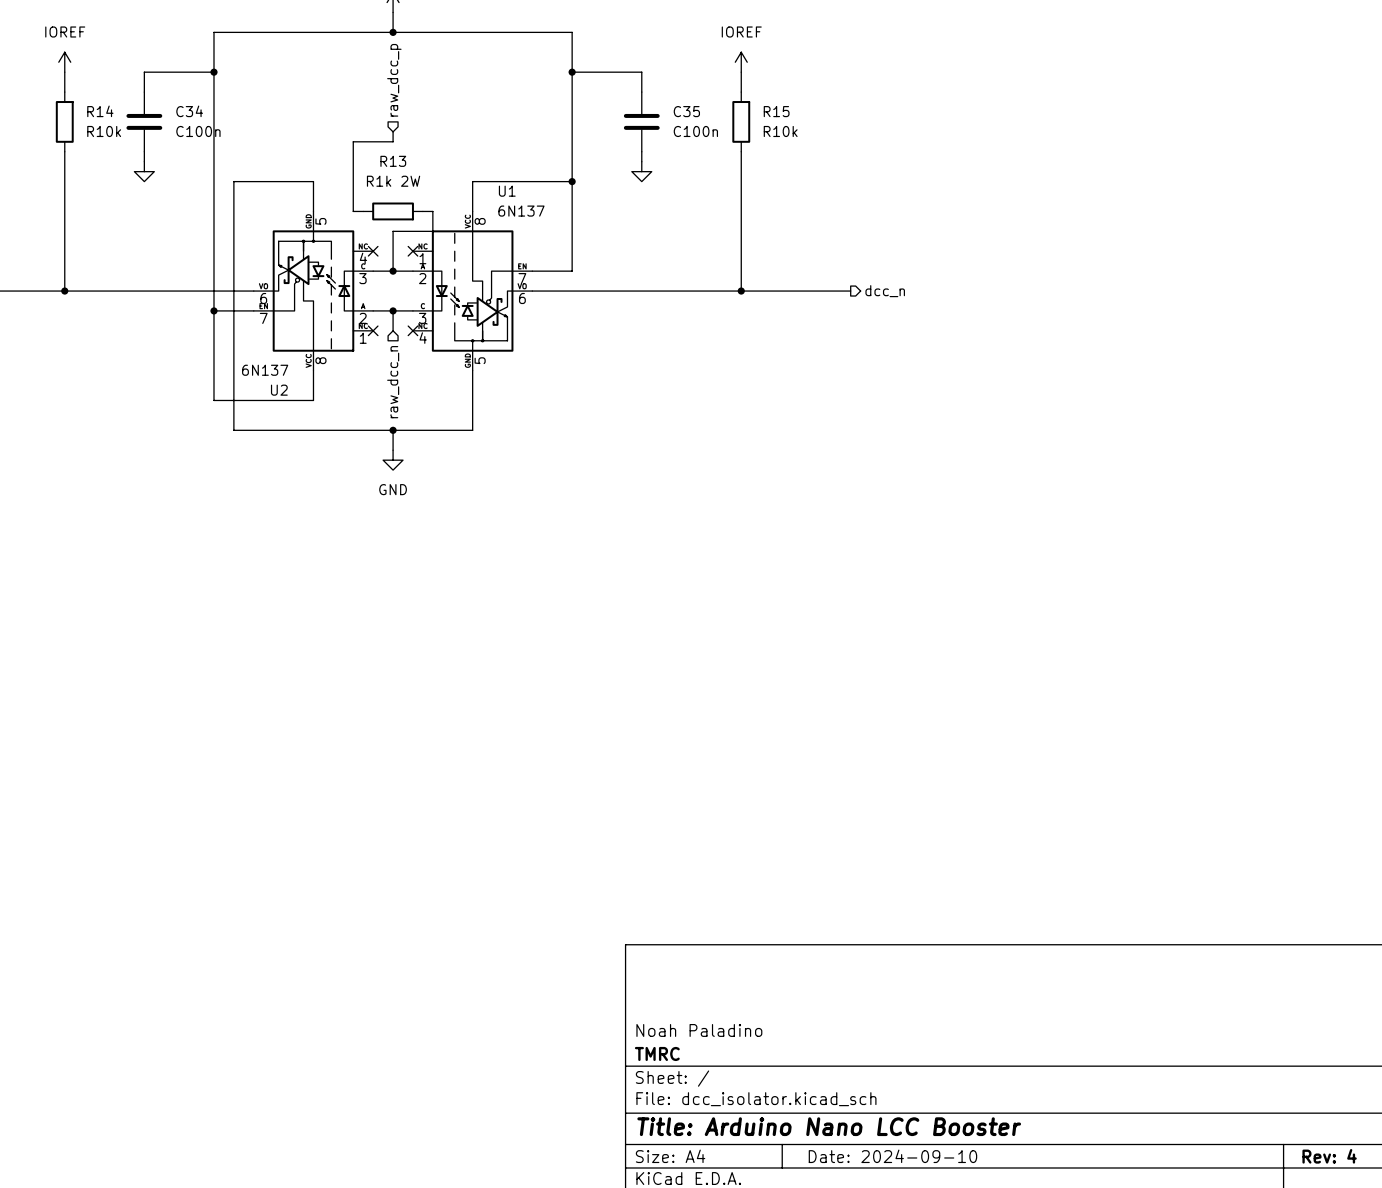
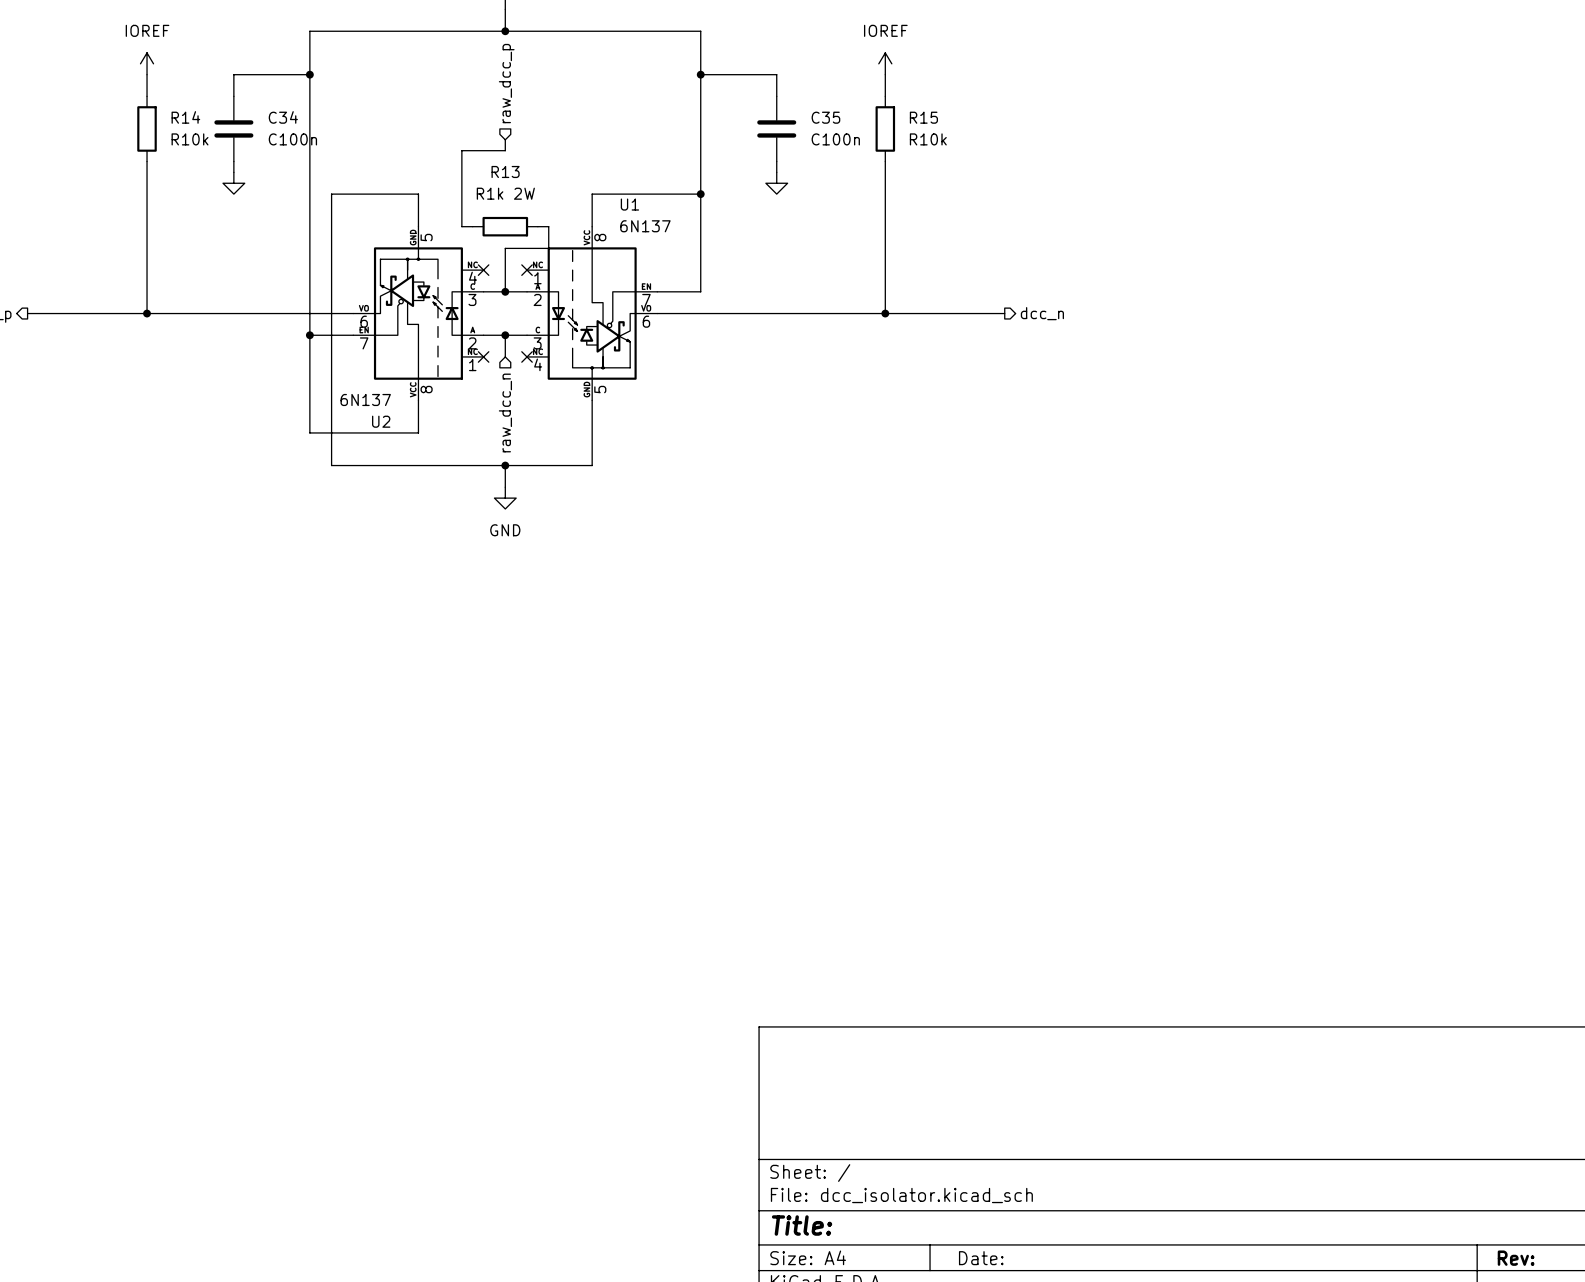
title block: Noah Paladino (699, 1030) -> none
title block: TMRC (657, 1053) -> none
title block: Title: Arduino Nano LCC Booster (829, 1126) -> Title: (802, 1225)
title block: Date: 2024-09-10 (892, 1156) -> Date: (981, 1258)
title block: Rev: 4 (1329, 1156) -> Rev: (1516, 1258)

